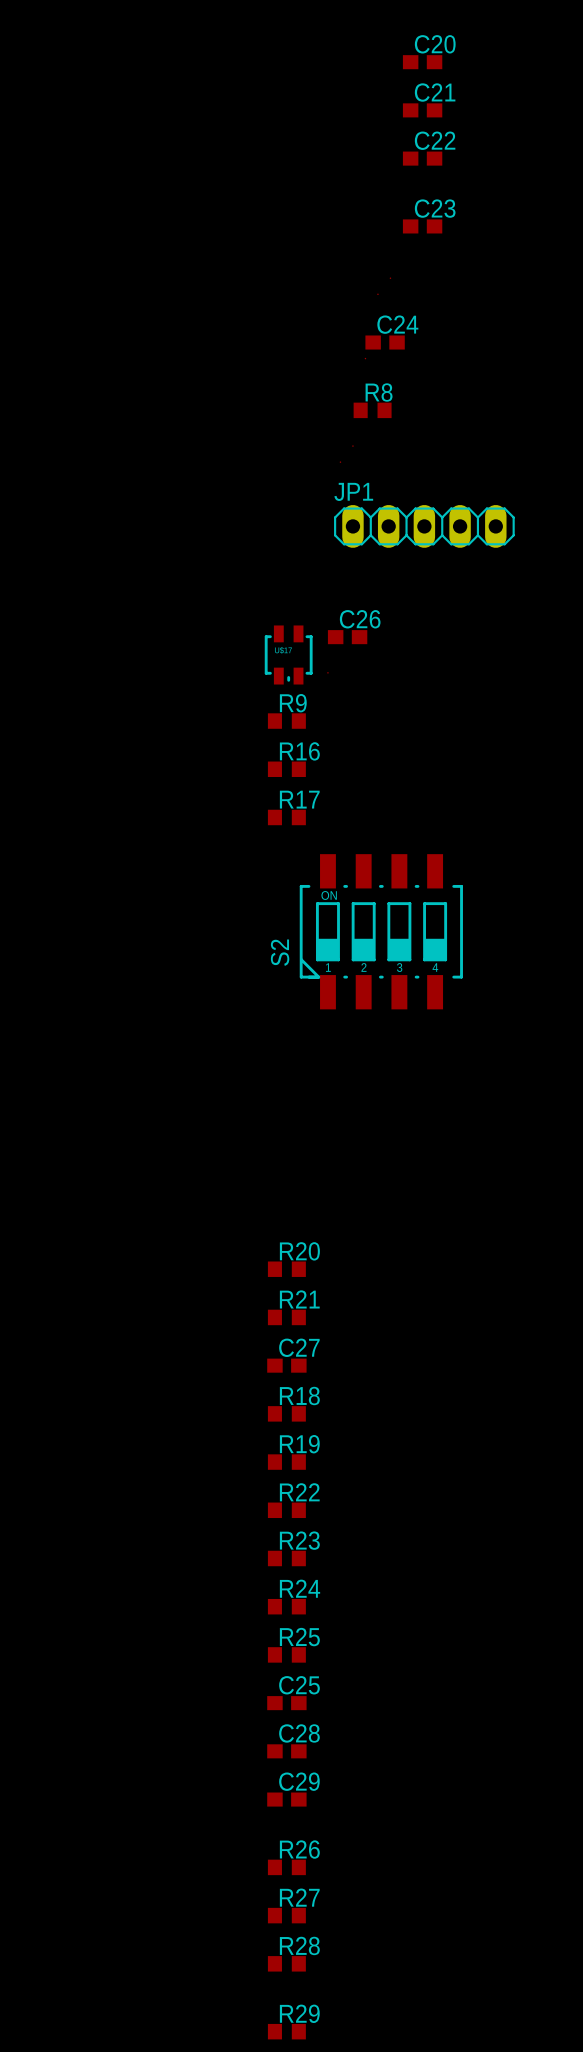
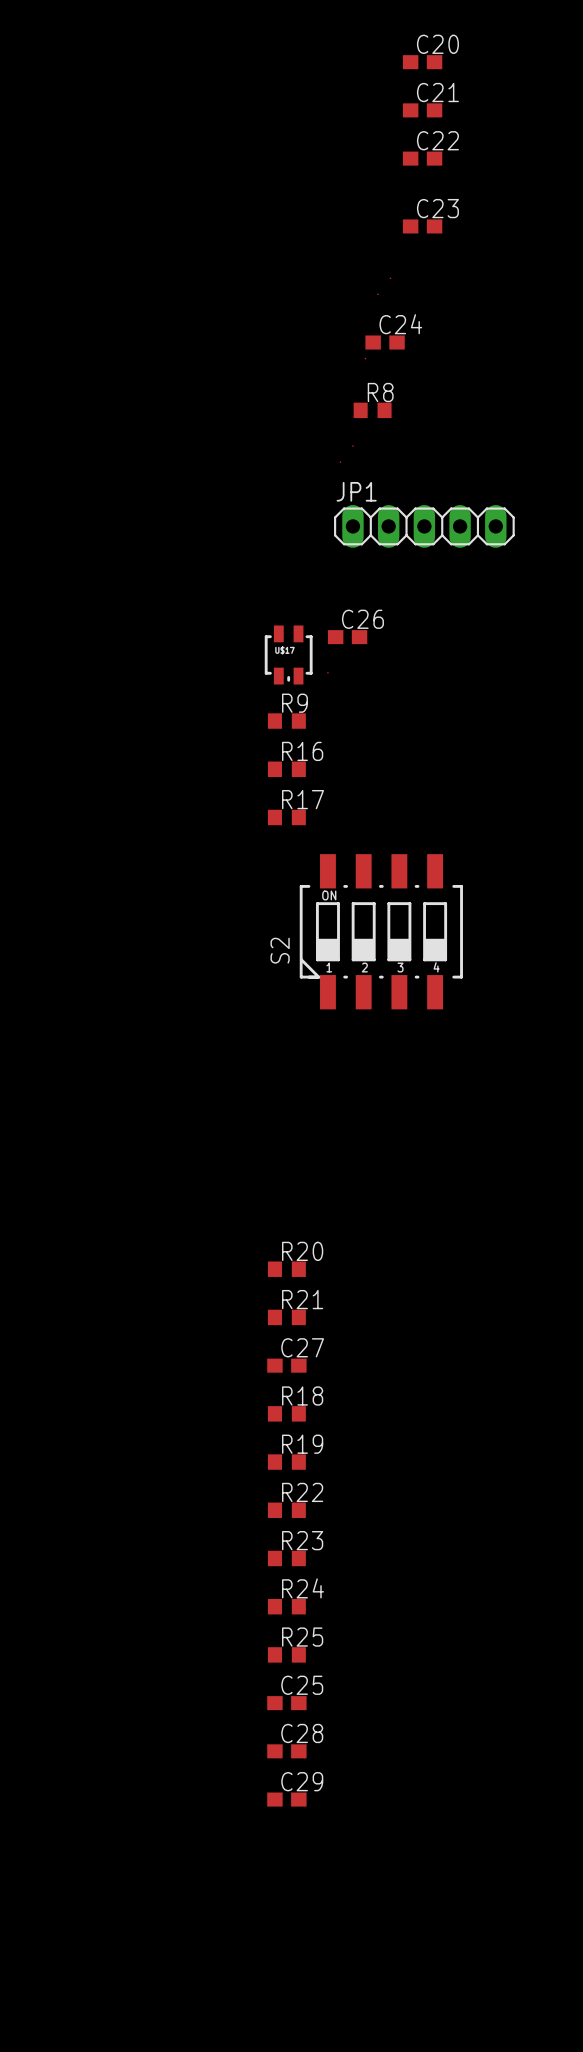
R26: (286, 1867) -> none
R27: (286, 1915) -> none
R28: (286, 1963) -> none
R29: (286, 2031) -> none

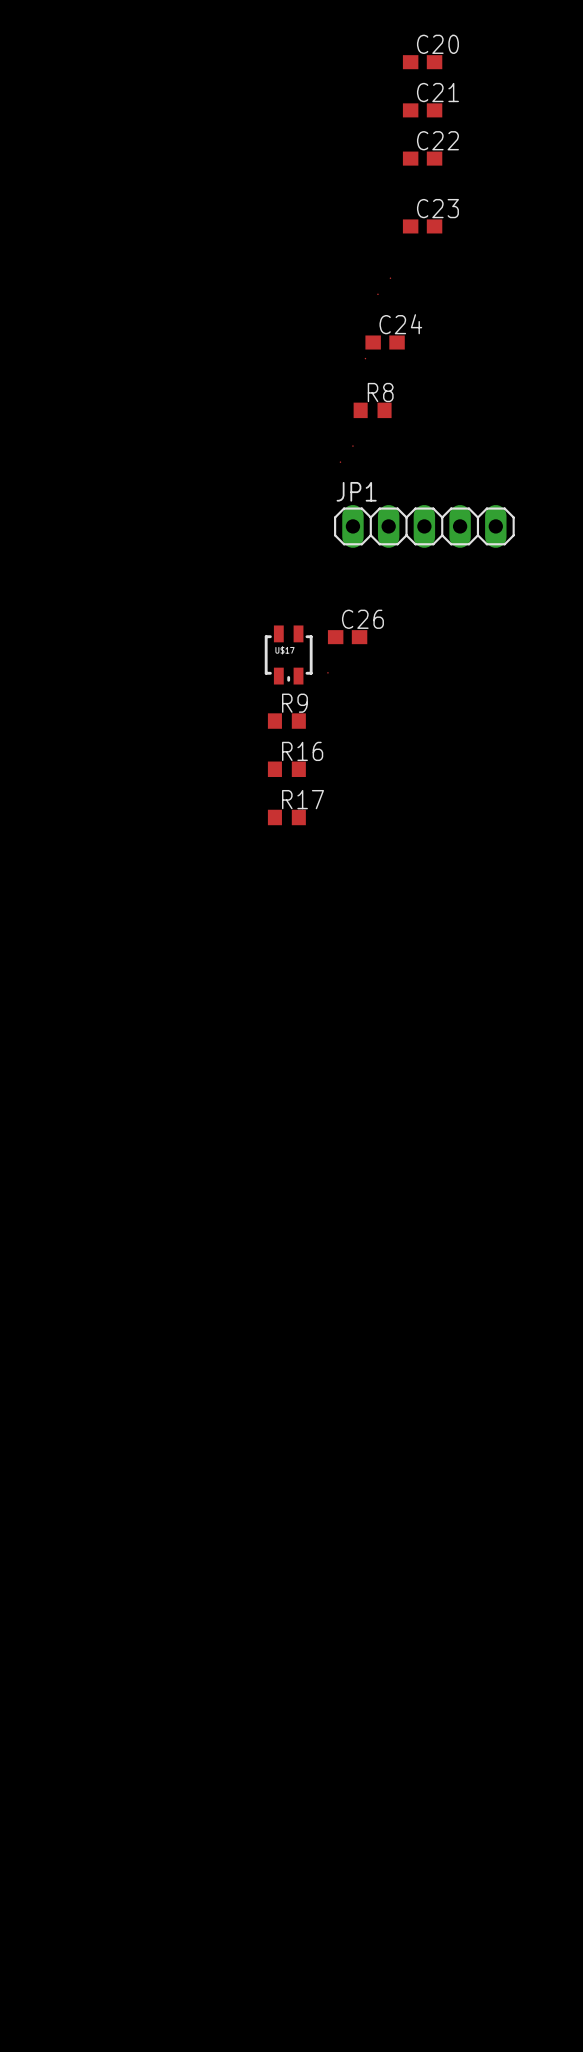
S2: (381, 931) -> none
R20: (286, 1269) -> none
R21: (286, 1317) -> none
C27: (286, 1365) -> none
R18: (286, 1413) -> none
R19: (286, 1462) -> none
R22: (286, 1510) -> none
R23: (286, 1558) -> none
R24: (286, 1606) -> none
R25: (286, 1654) -> none
C25: (286, 1703) -> none
C28: (286, 1751) -> none
C29: (286, 1799) -> none

